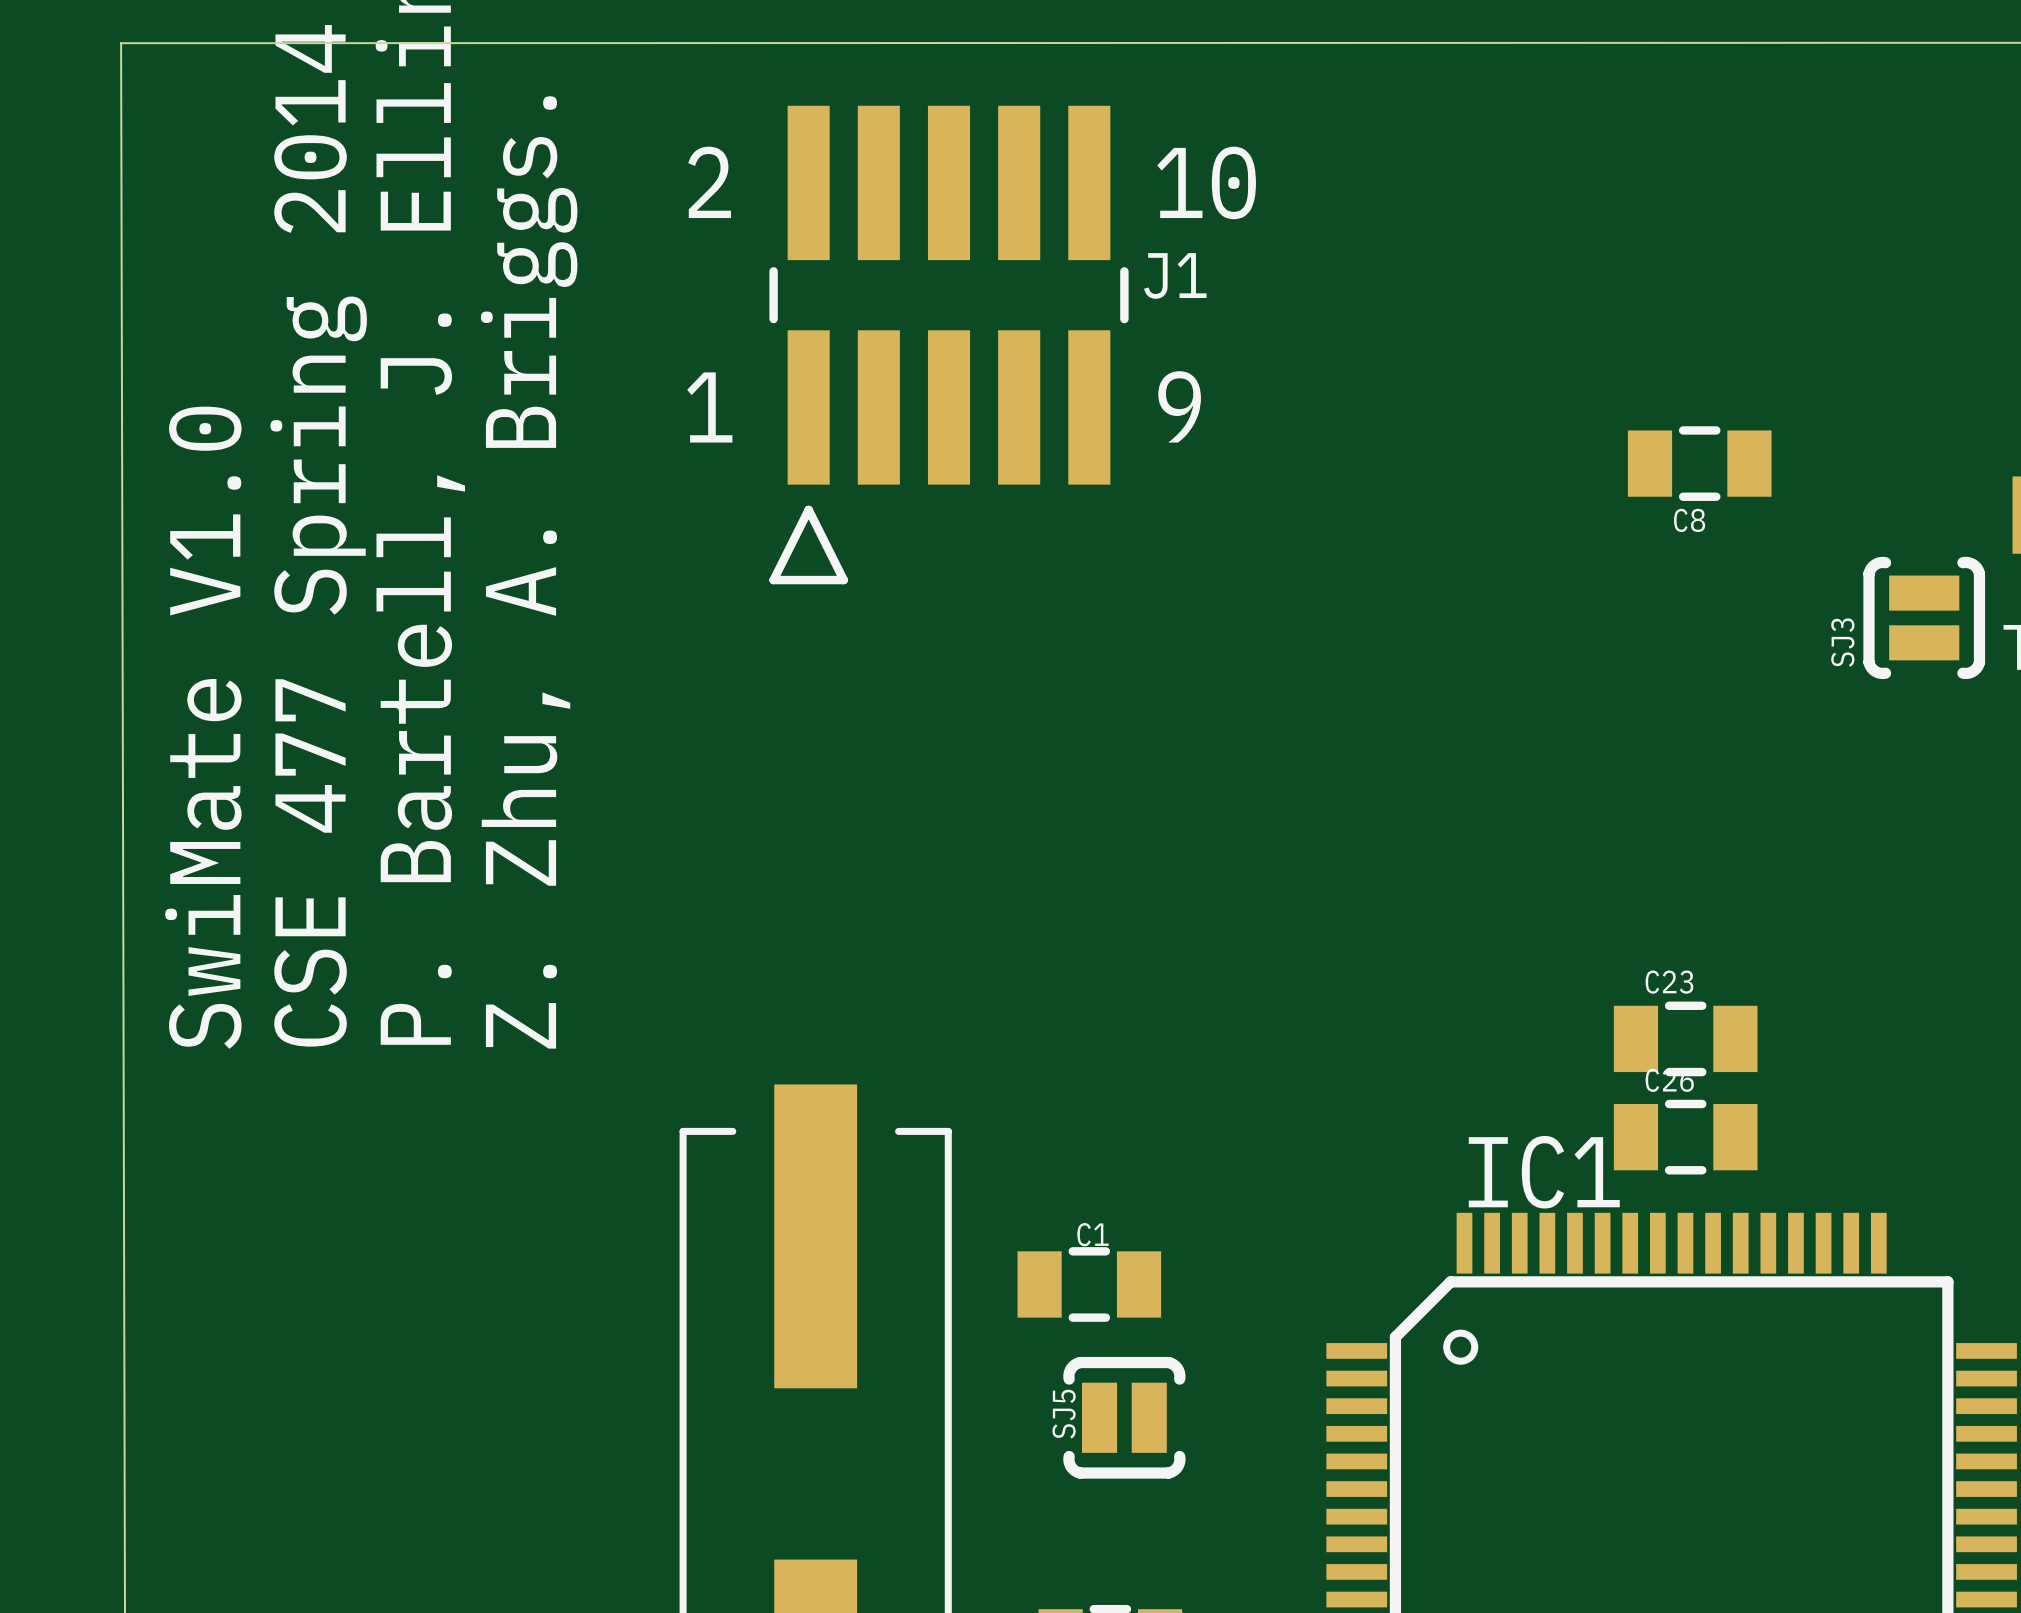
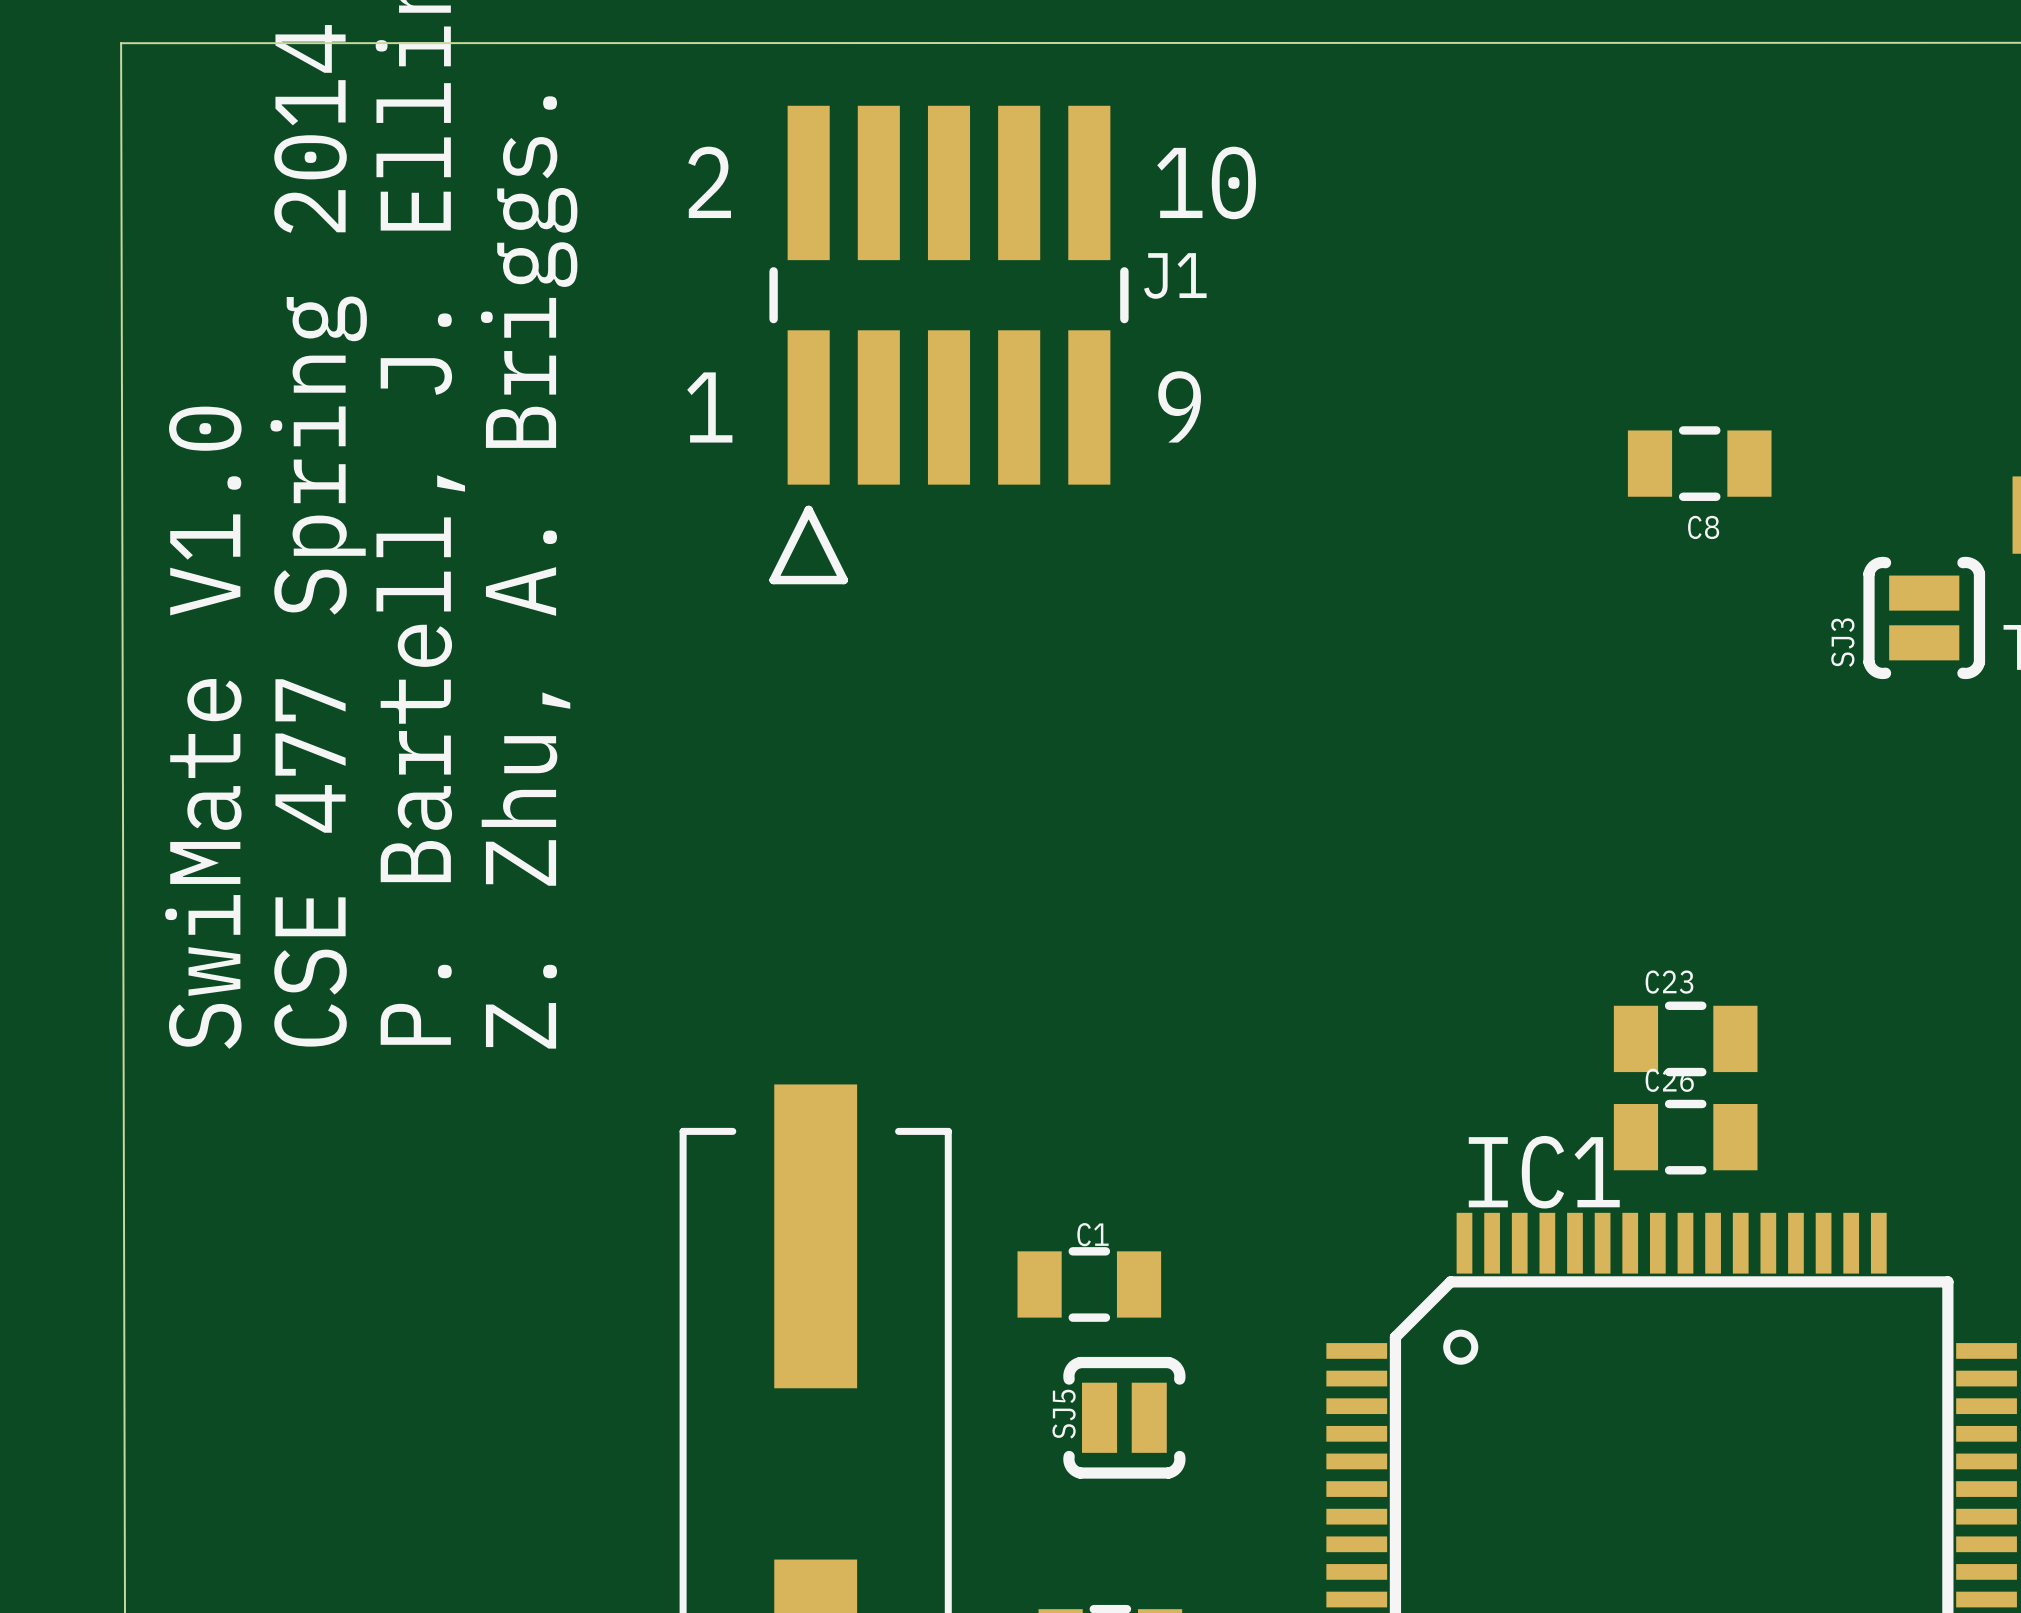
C8 name position: C8 (1689, 520) -> C8 (1703, 527)

